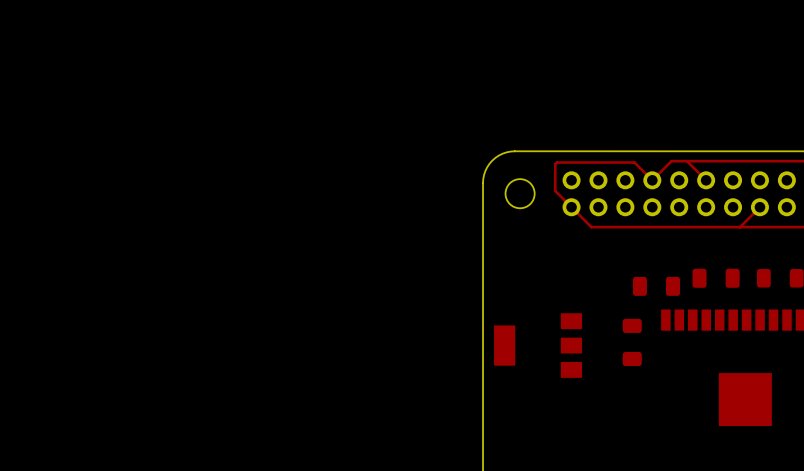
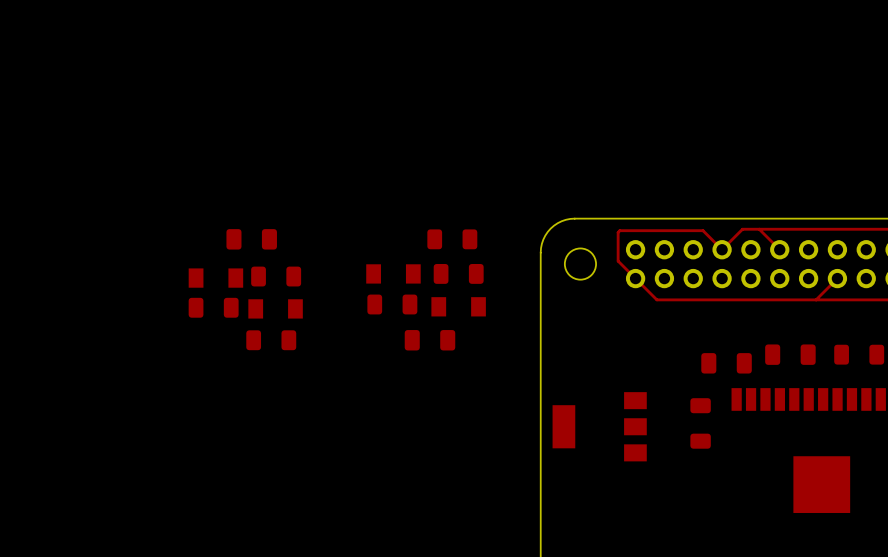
part: none -> (251, 239)
part: none -> (452, 239)
part: none -> (393, 273)
part: none -> (458, 273)
part: none -> (276, 276)
part: none -> (215, 278)
part: none -> (392, 304)
part: none -> (458, 306)
part: none -> (213, 307)
part: none -> (275, 308)
part: none -> (271, 340)
part: none -> (429, 340)

